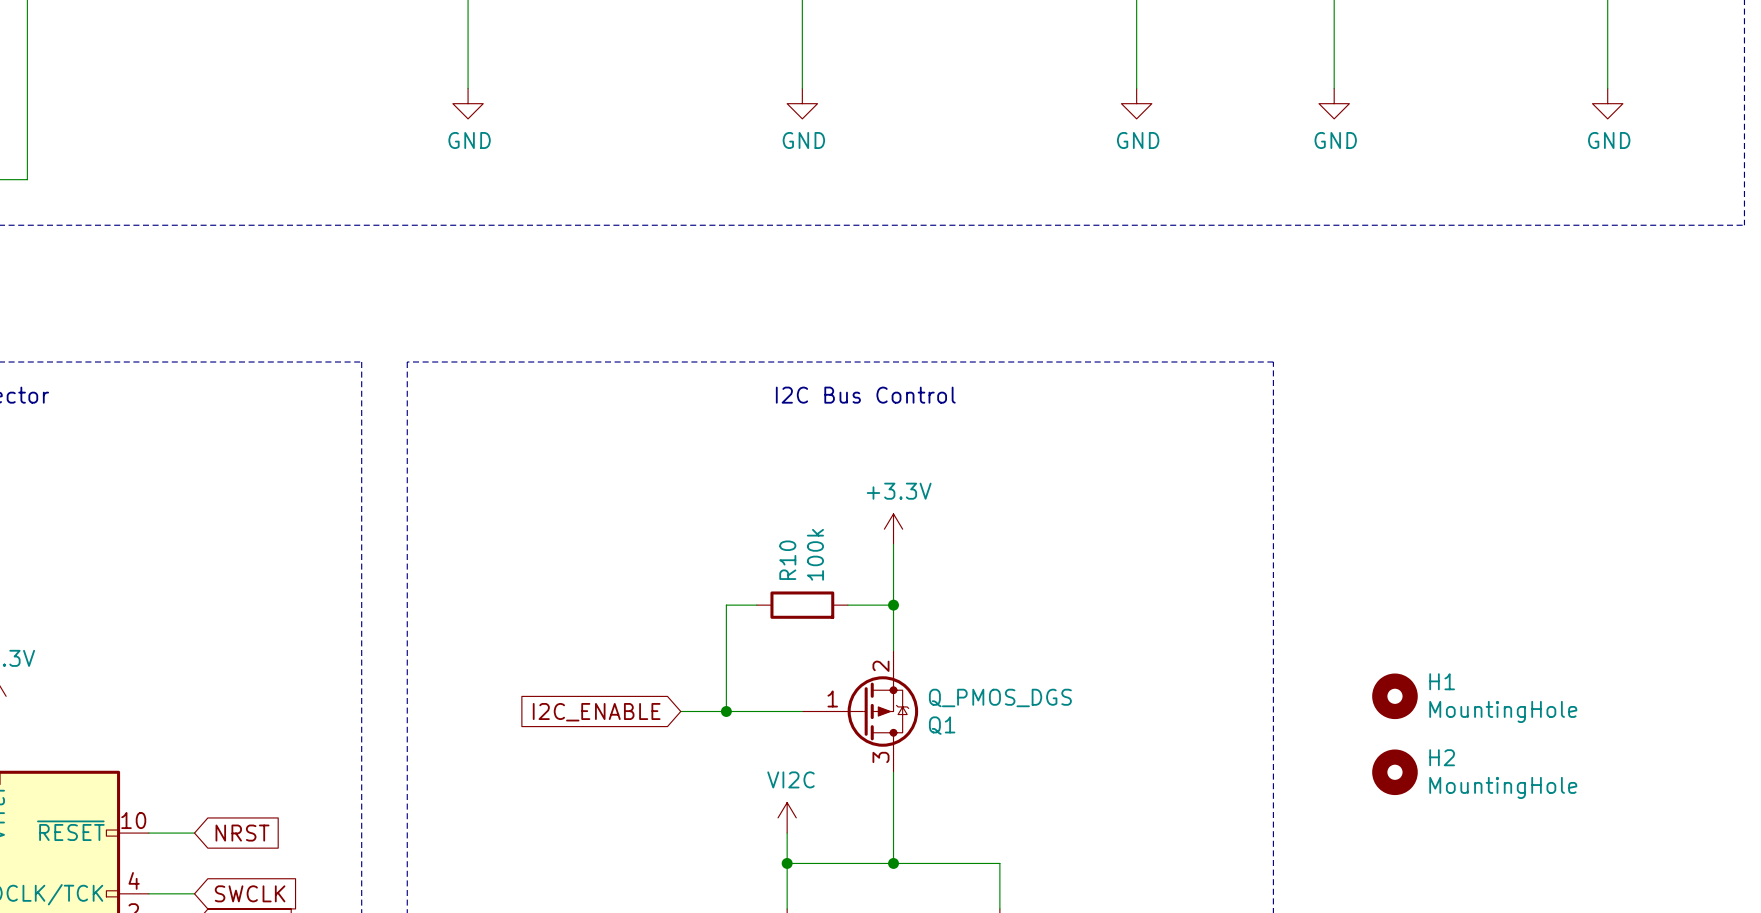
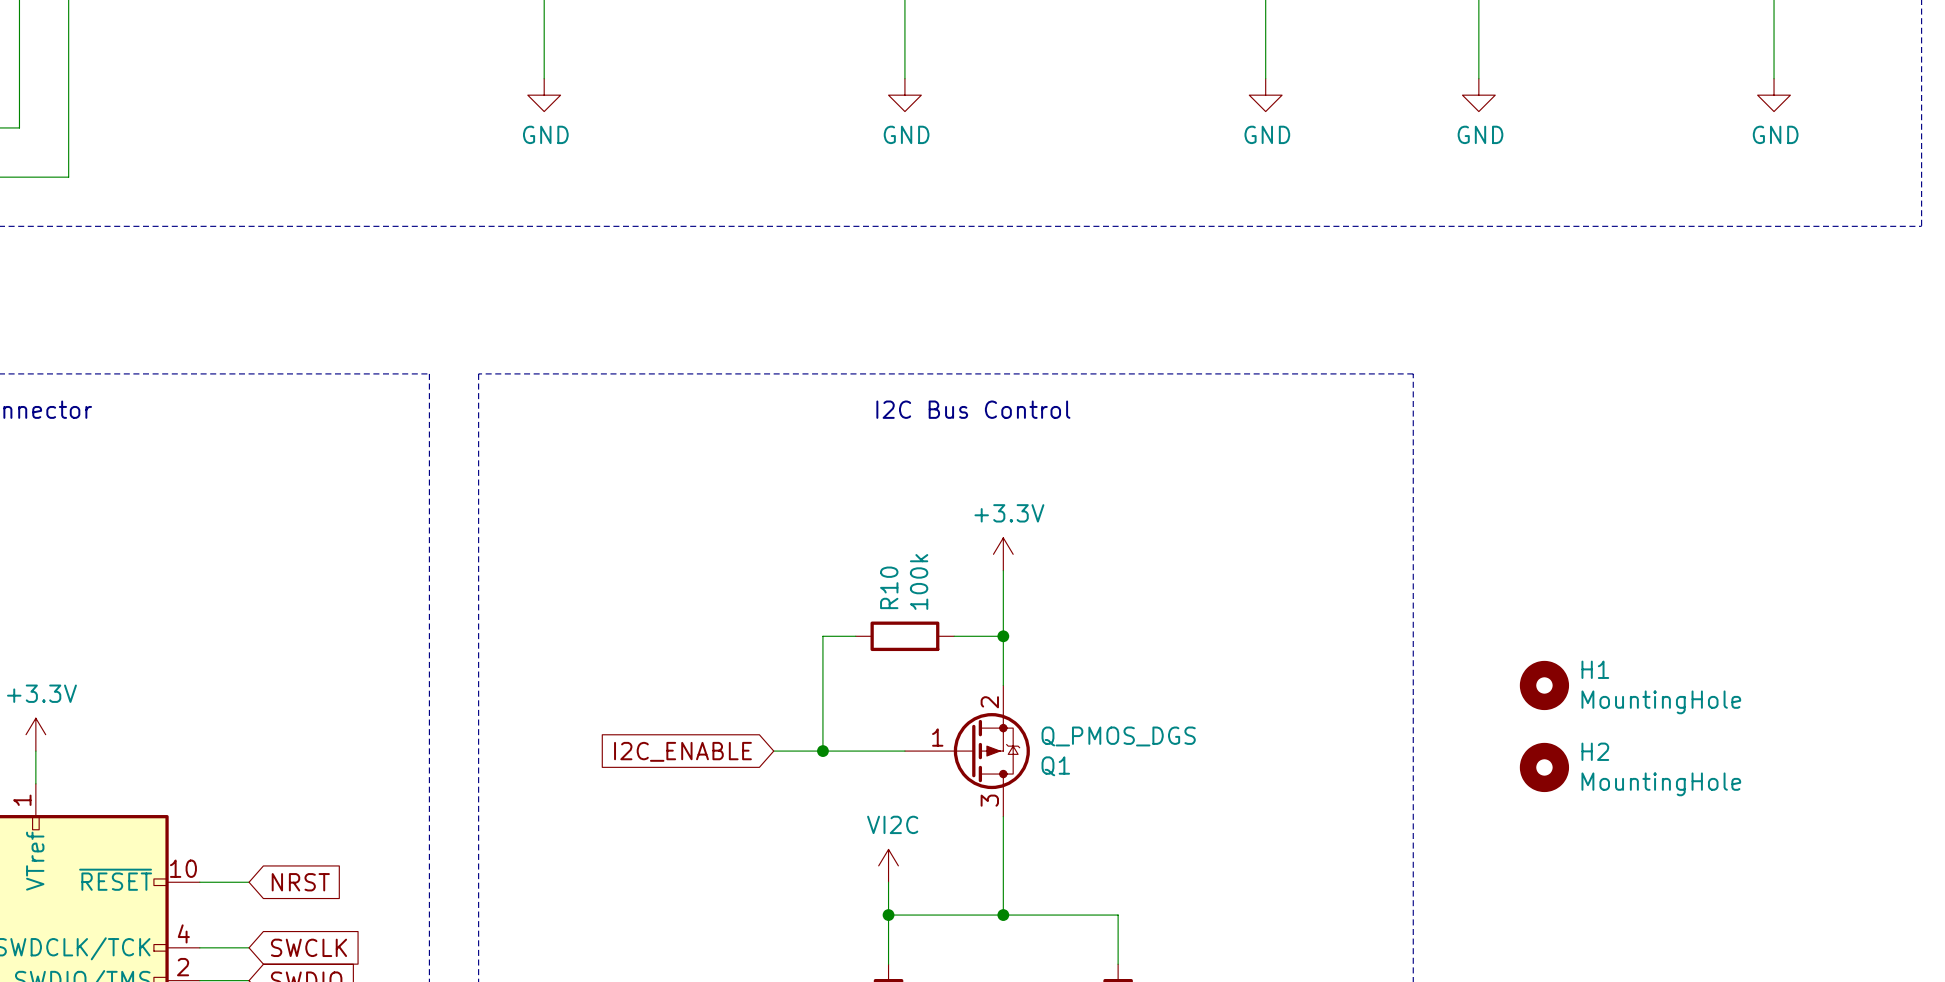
H1 position: (1394, 696) -> (1544, 685)
H2 position: (1394, 772) -> (1544, 767)

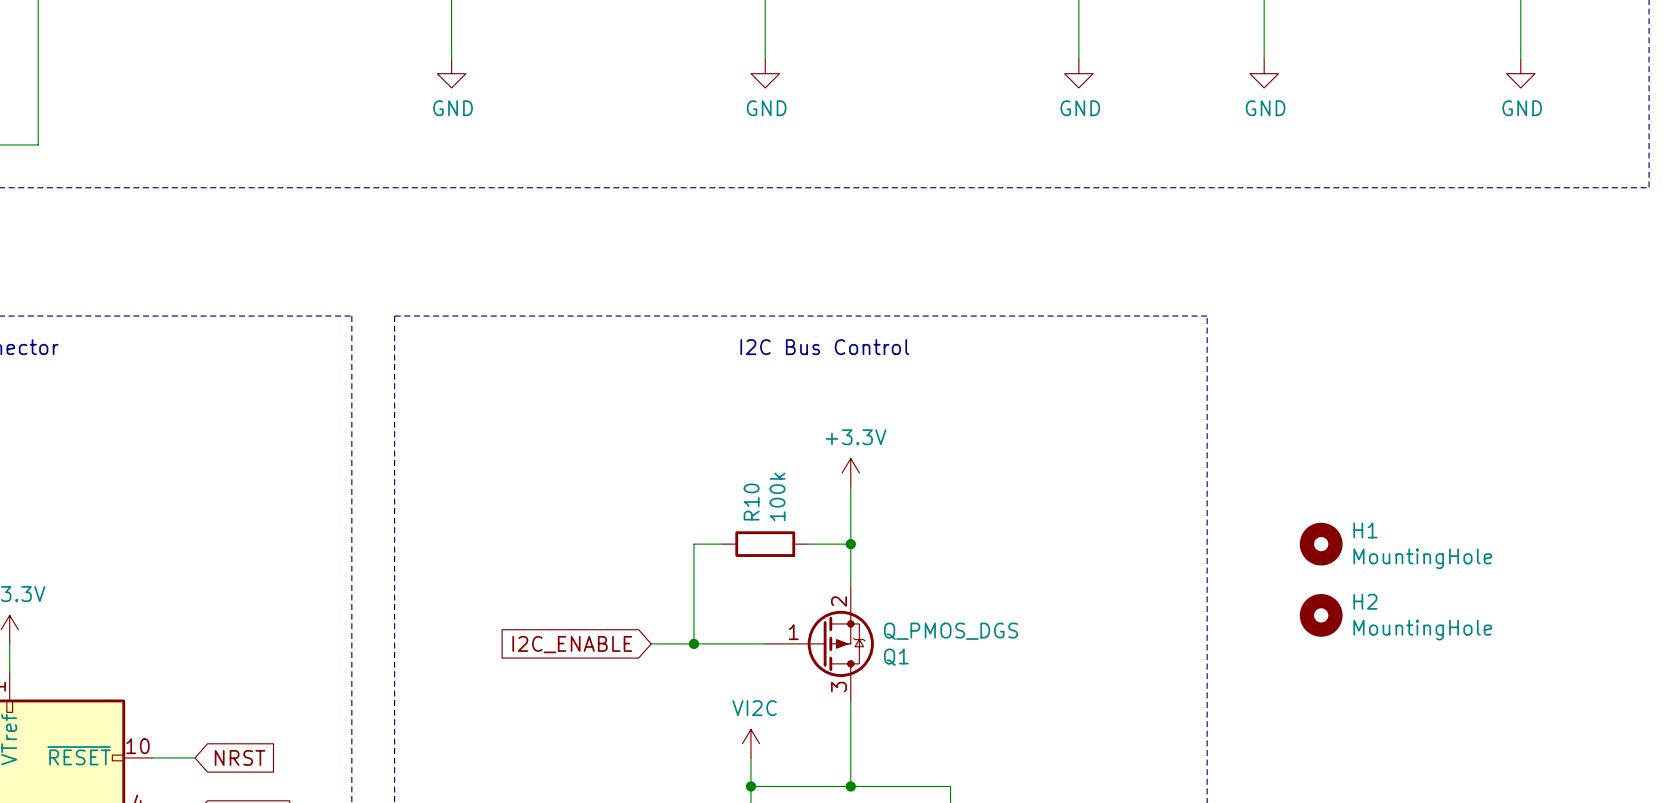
H1 position: (1544, 685) -> (1321, 544)
H2 position: (1544, 767) -> (1321, 615)

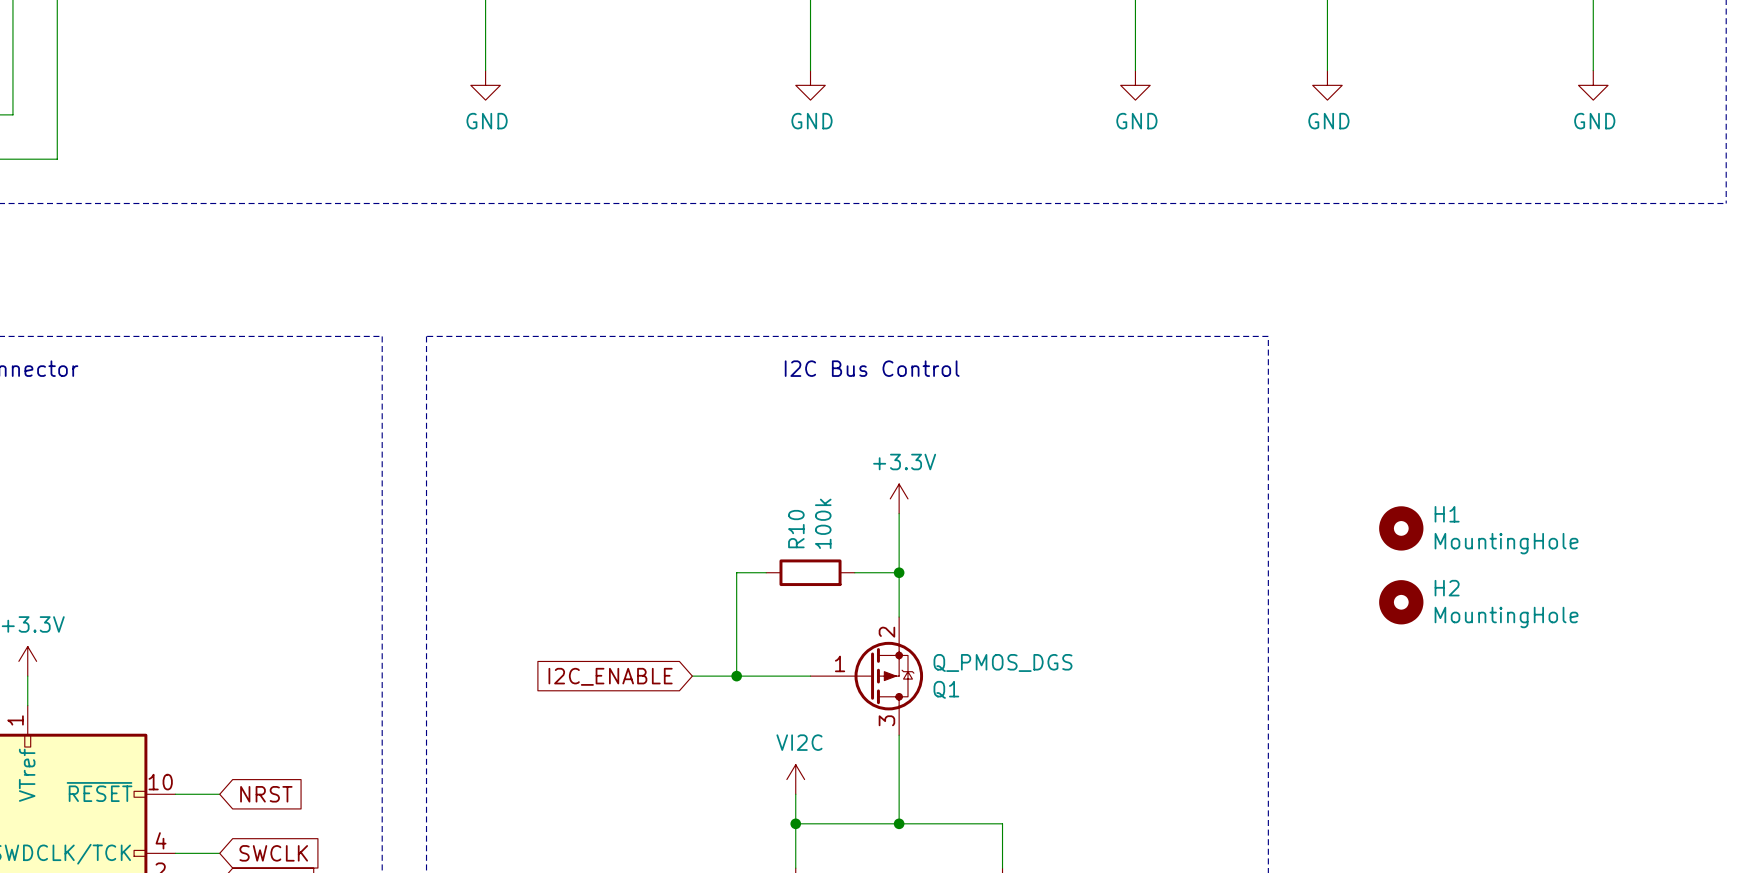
H1 position: (1321, 544) -> (1401, 528)
H2 position: (1321, 615) -> (1401, 602)

